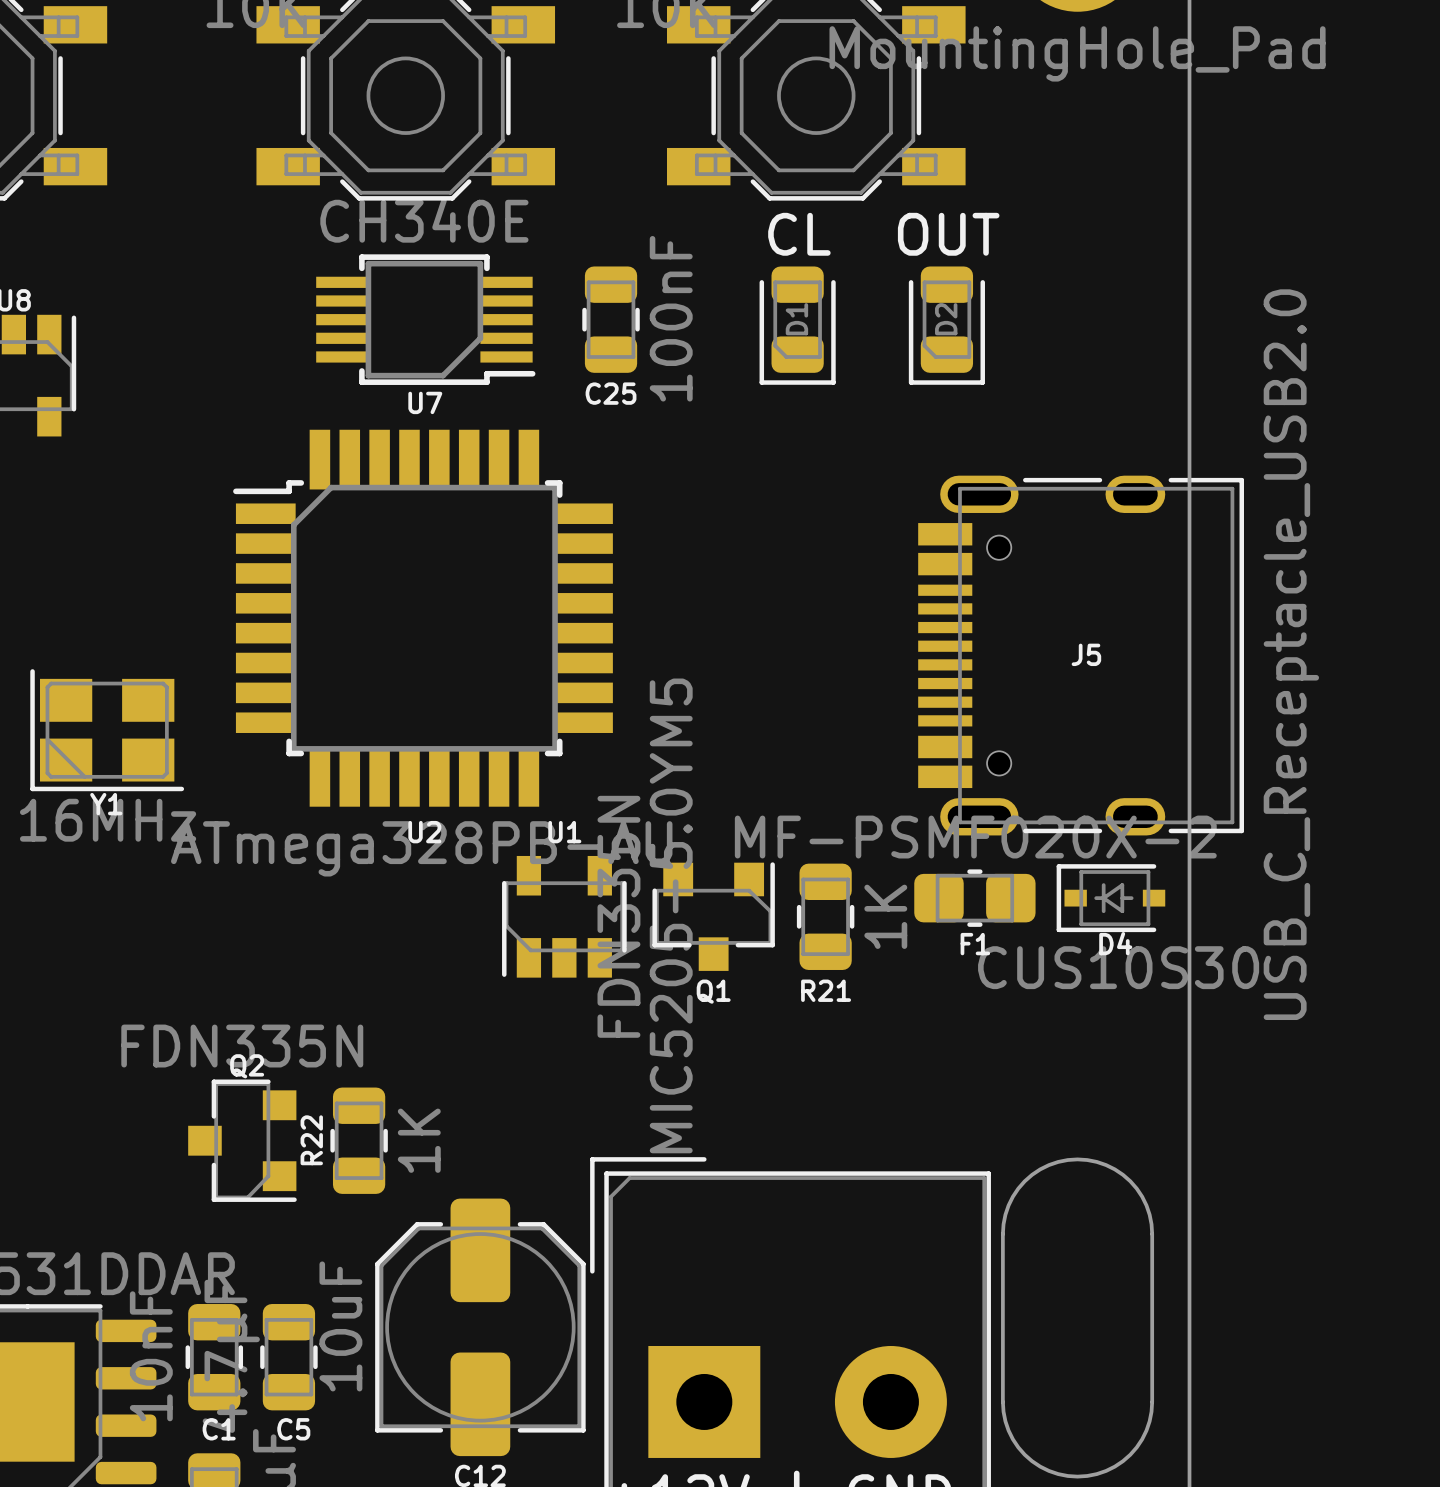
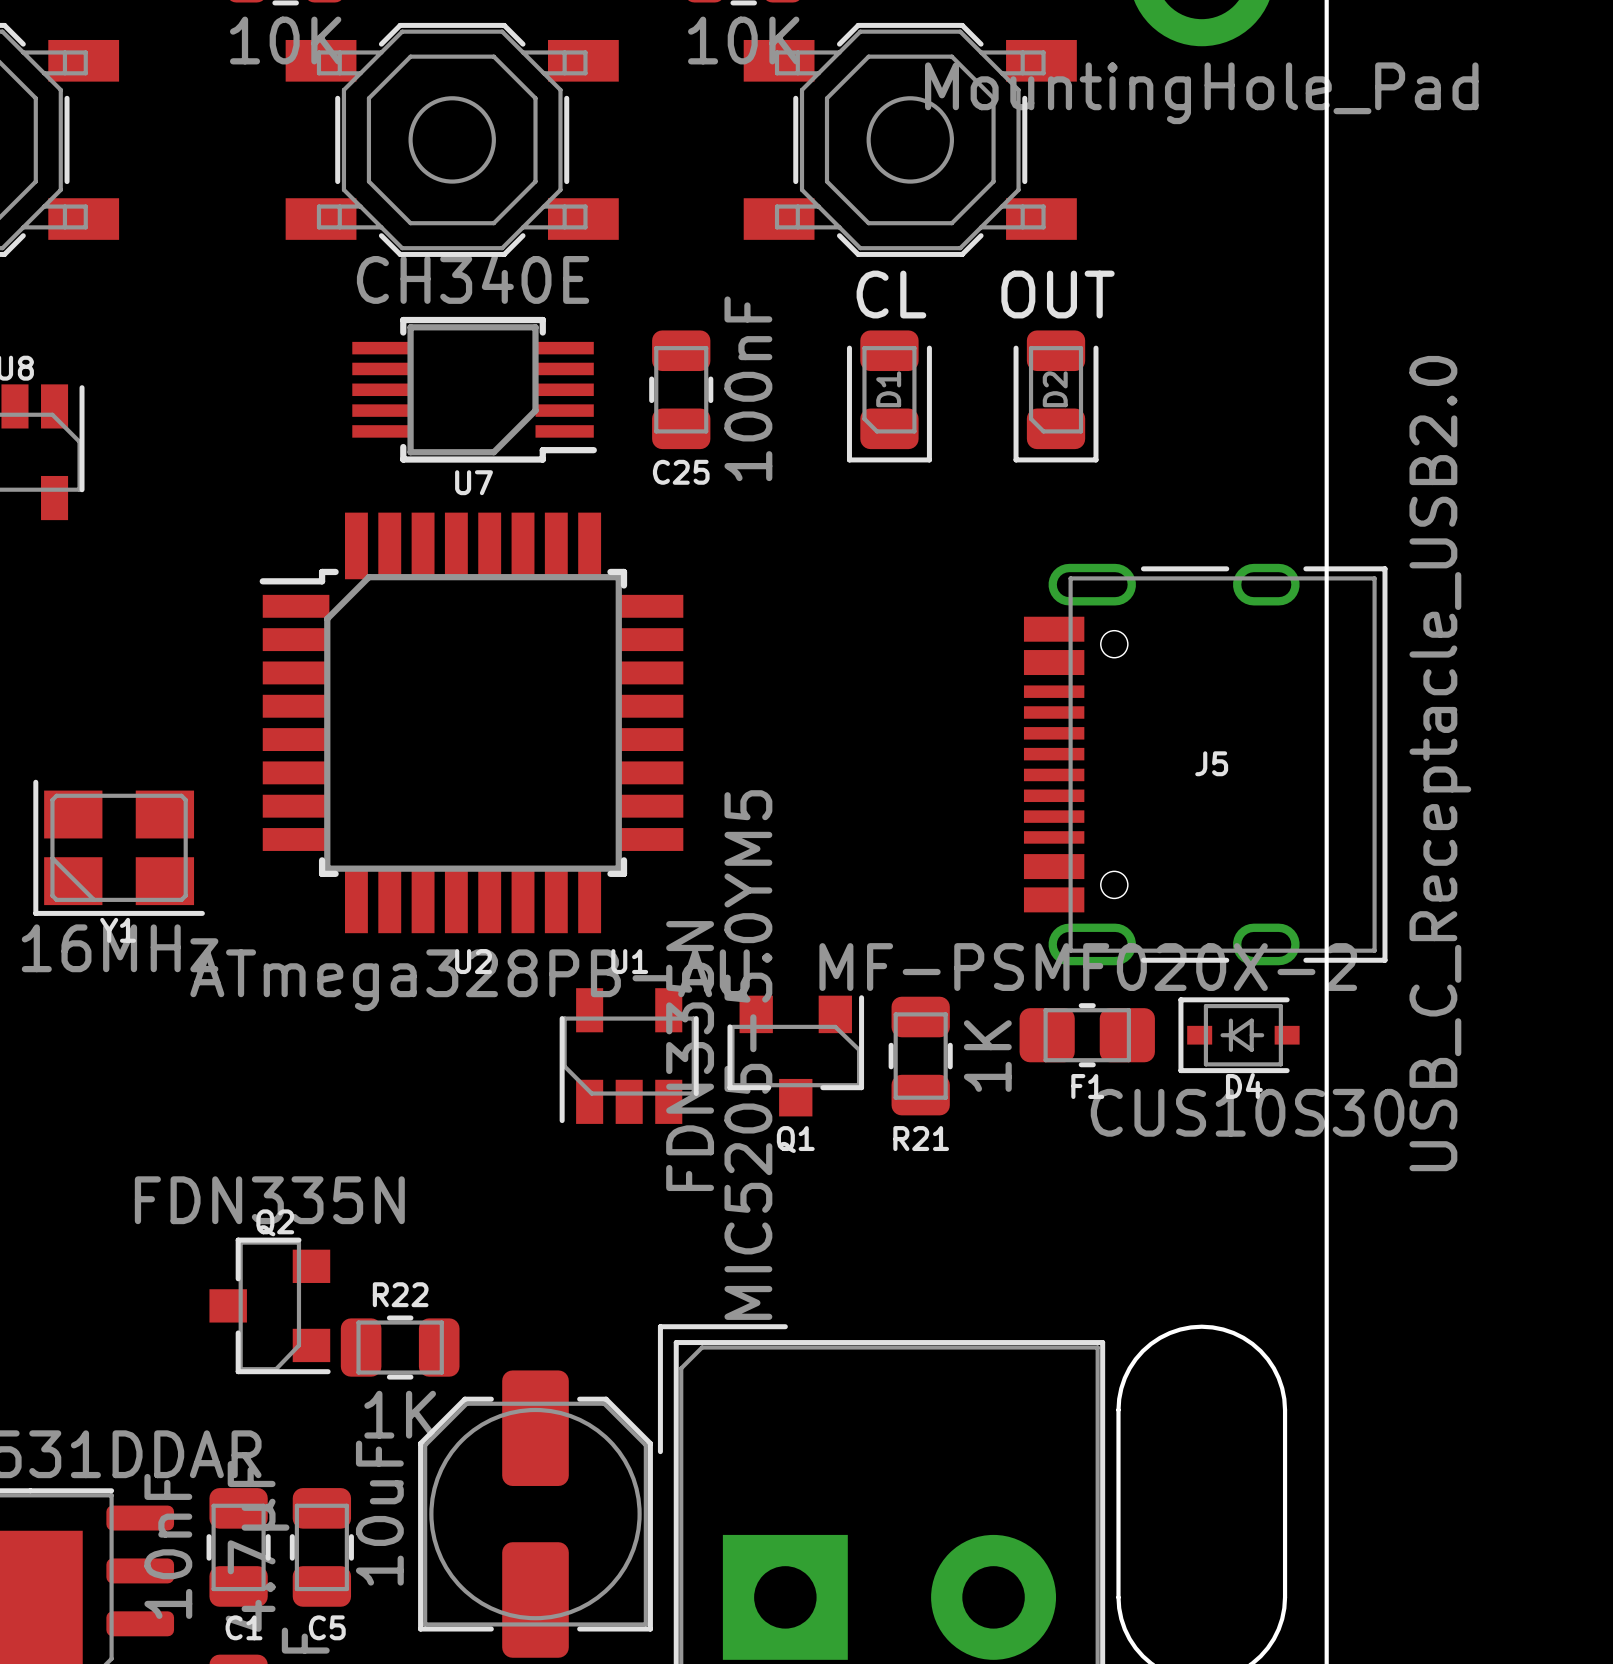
R22 rotation: 0° (359, 1140) -> 90° clockwise (400, 1347)

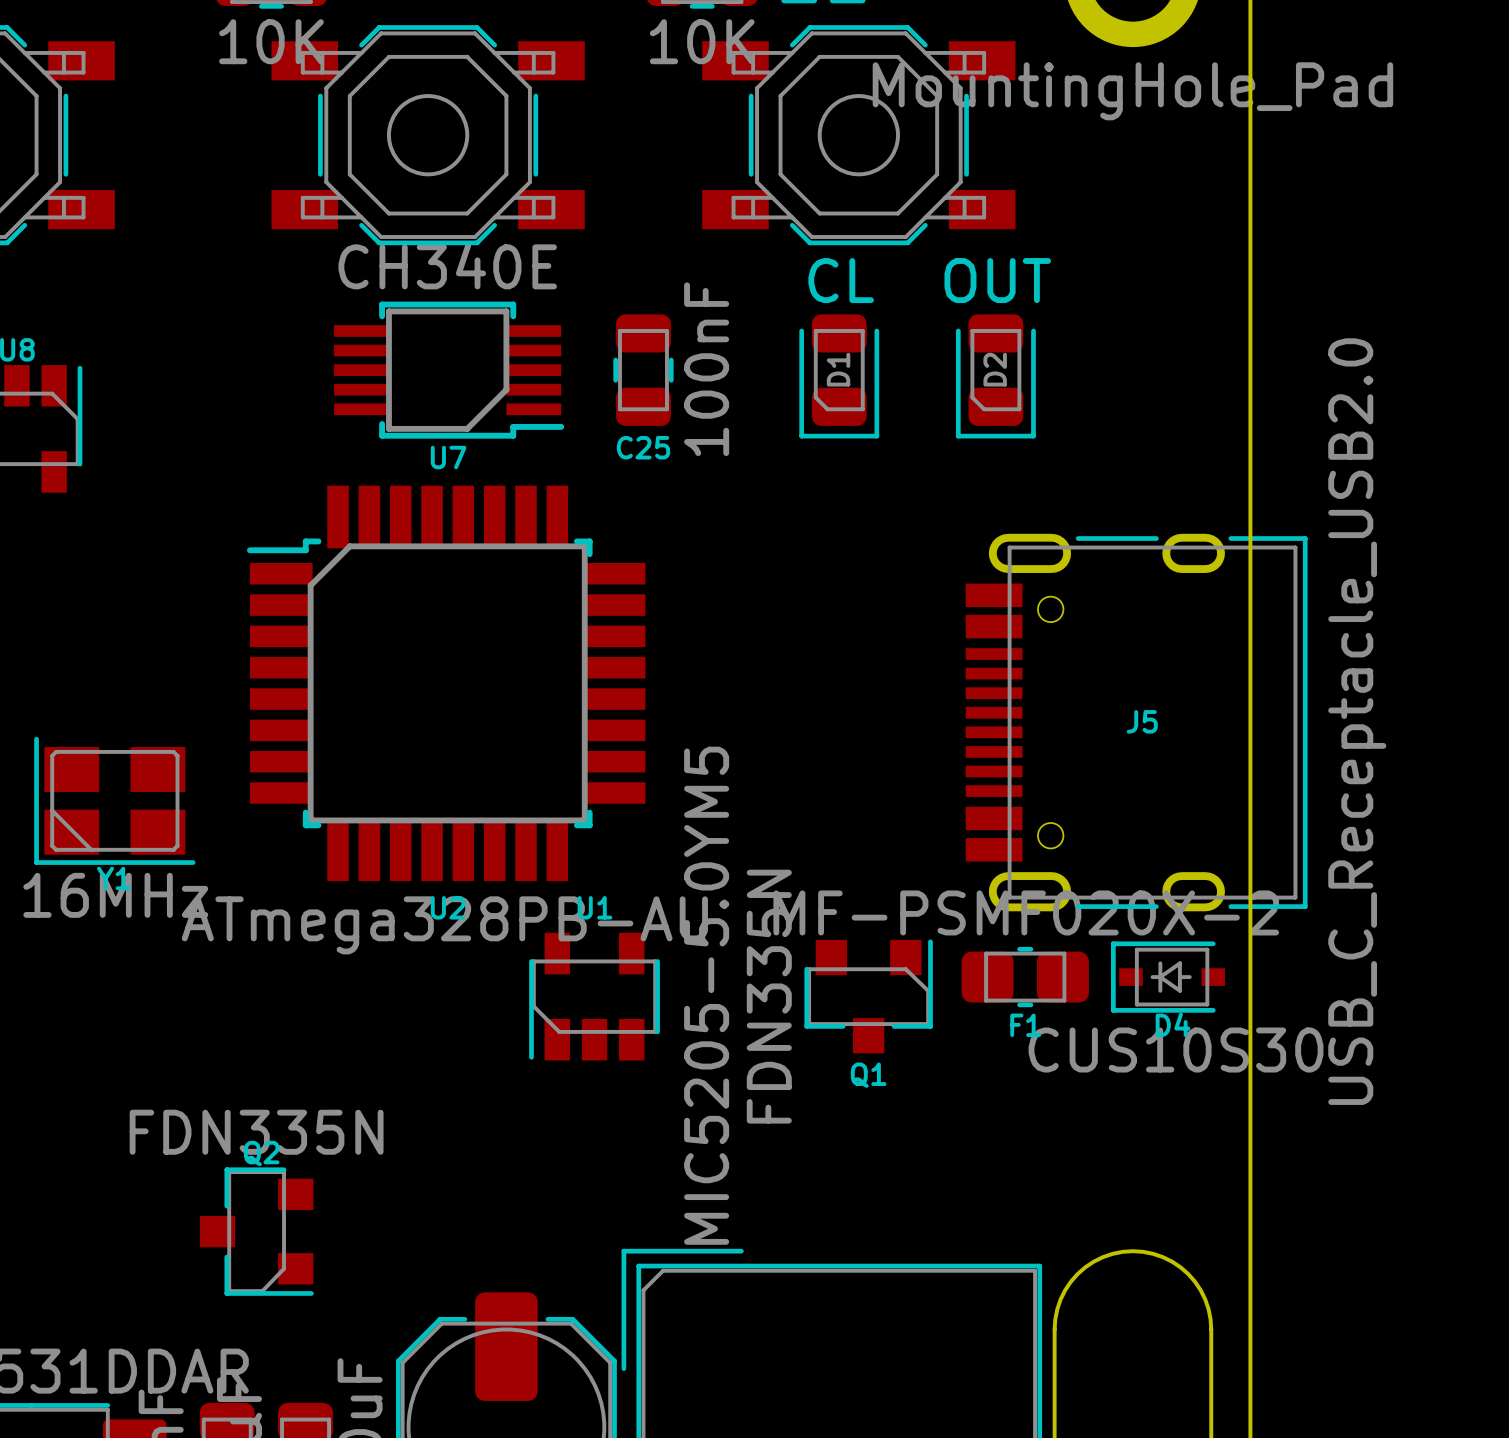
Q1 position: (795, 1055) -> (868, 996)
R21: 1K (920, 1056) -> none
R22: 1K (400, 1347) -> none

